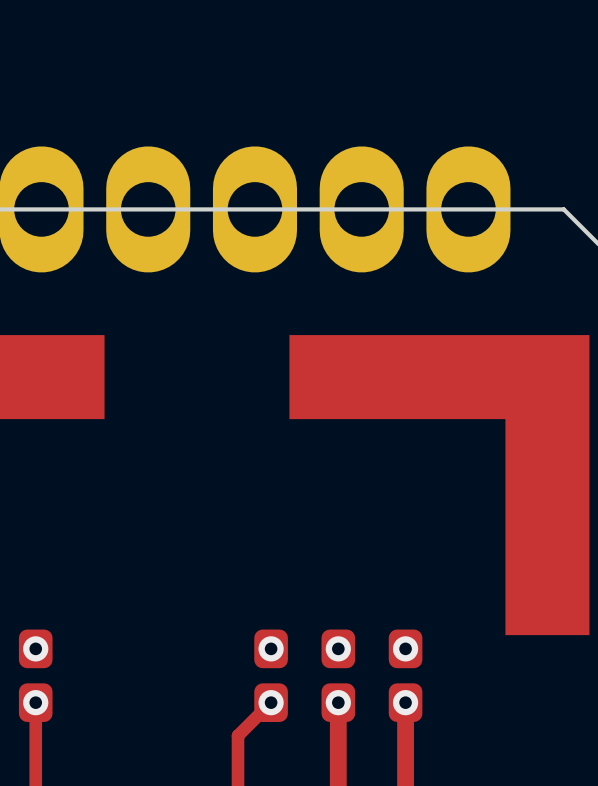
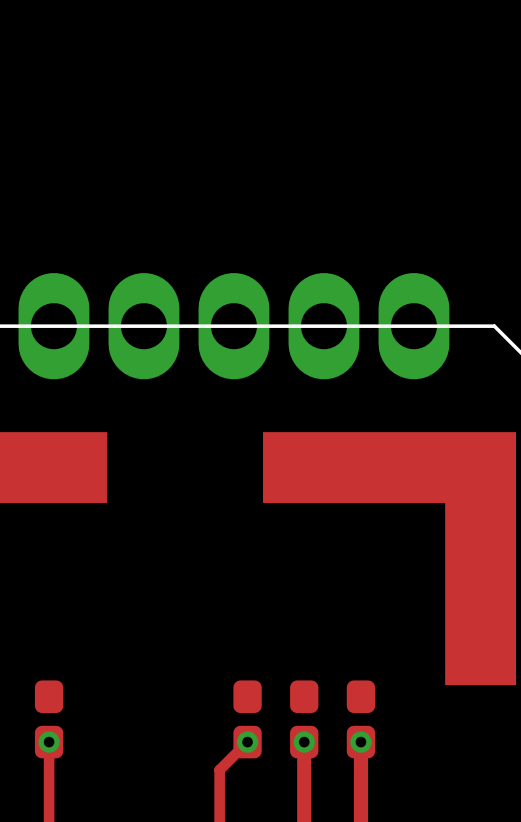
via: (35, 648) -> none
via: (271, 648) -> none
via: (338, 648) -> none
via: (405, 648) -> none

